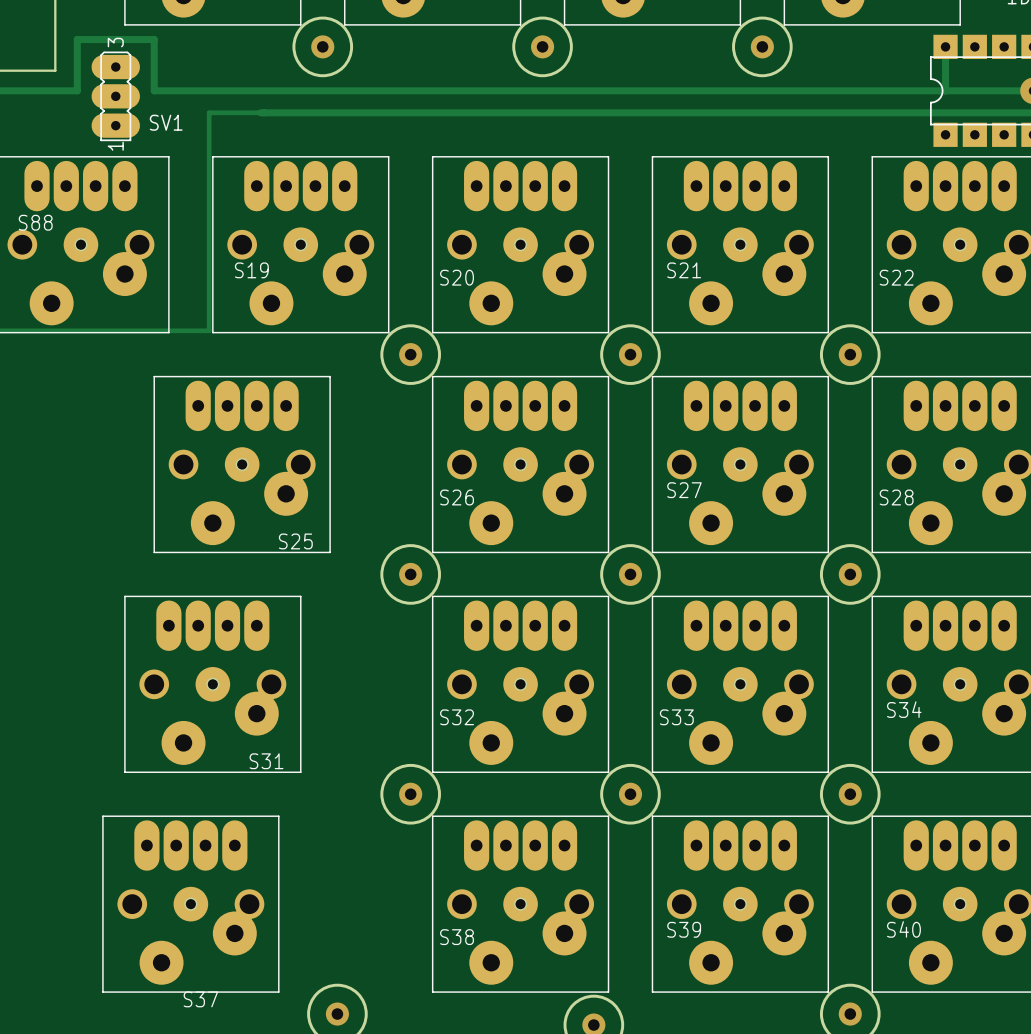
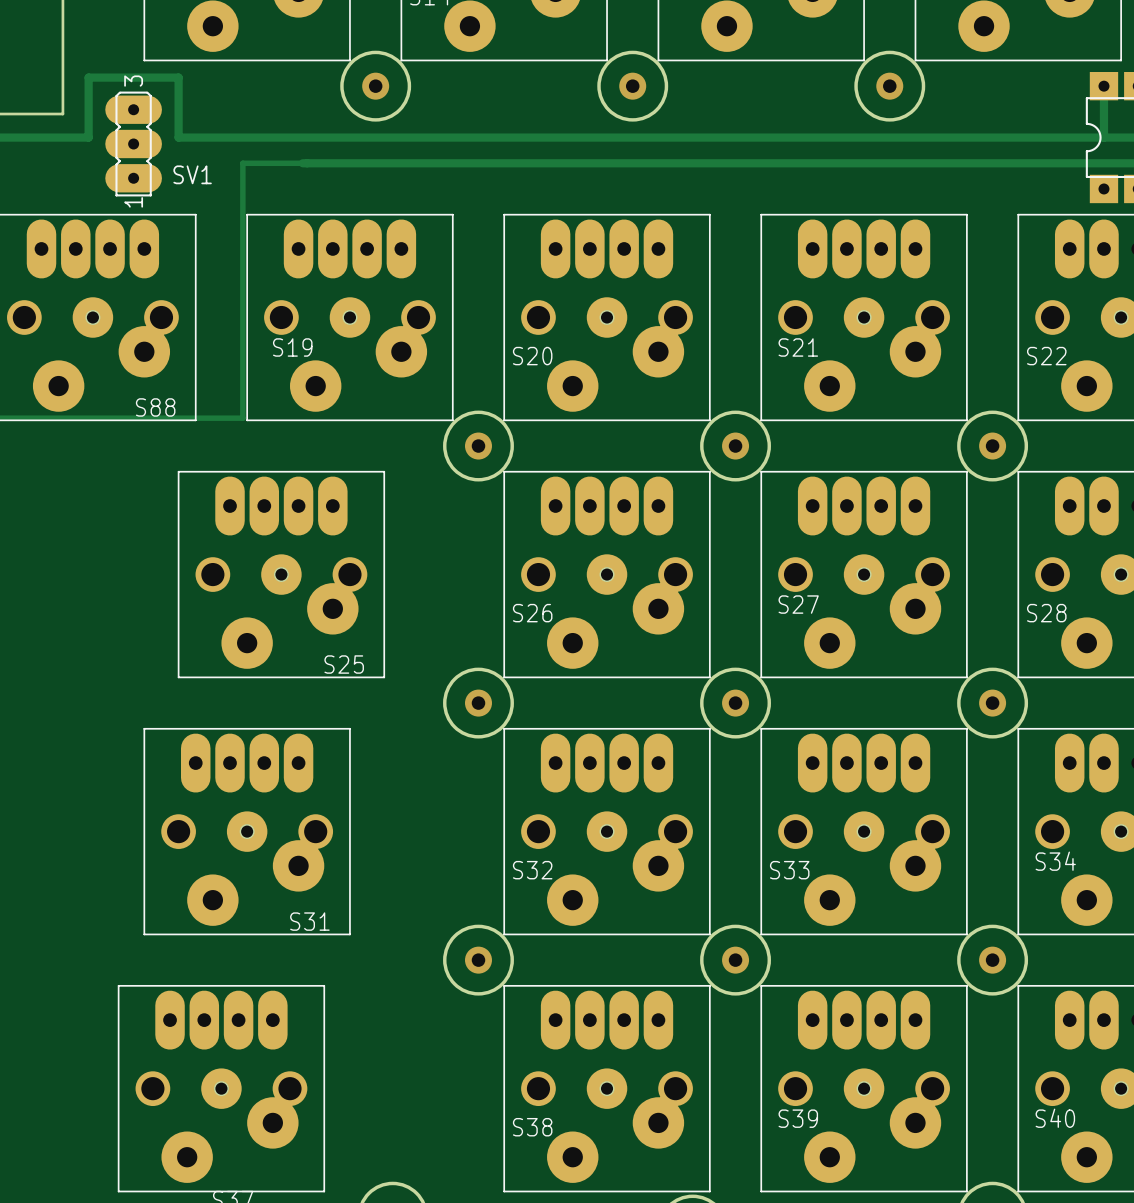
S88 name position: S88 (35, 222) -> S88 (155, 407)

